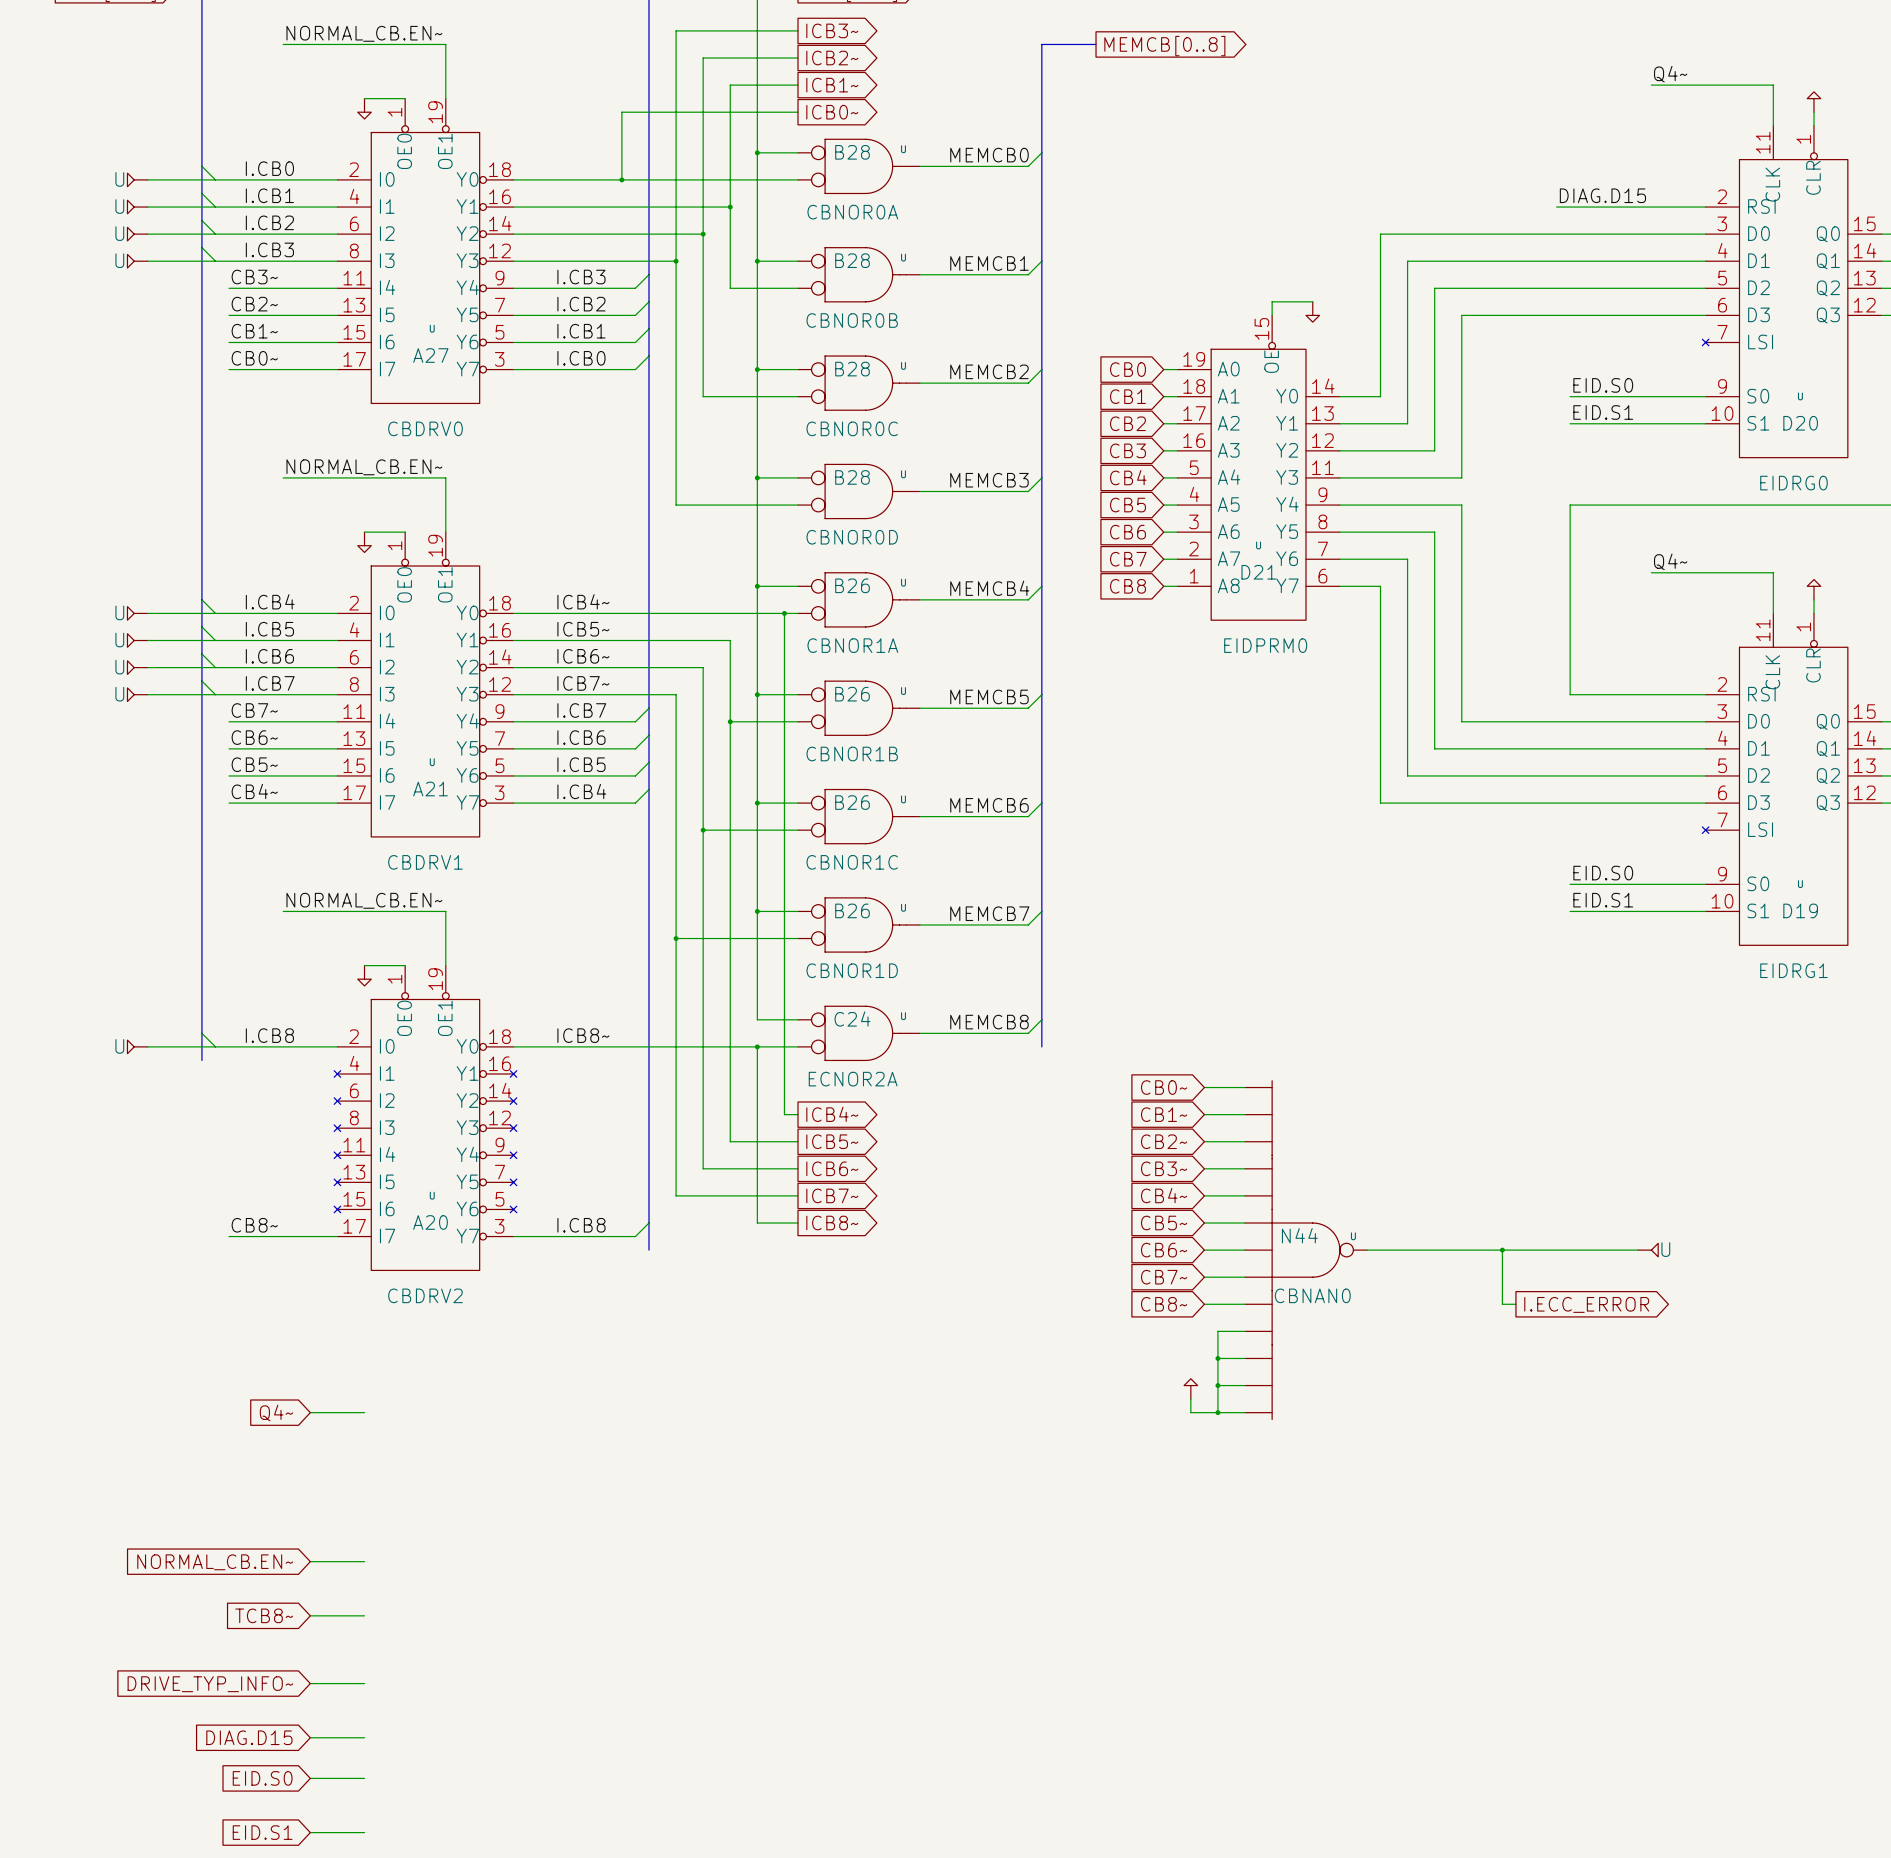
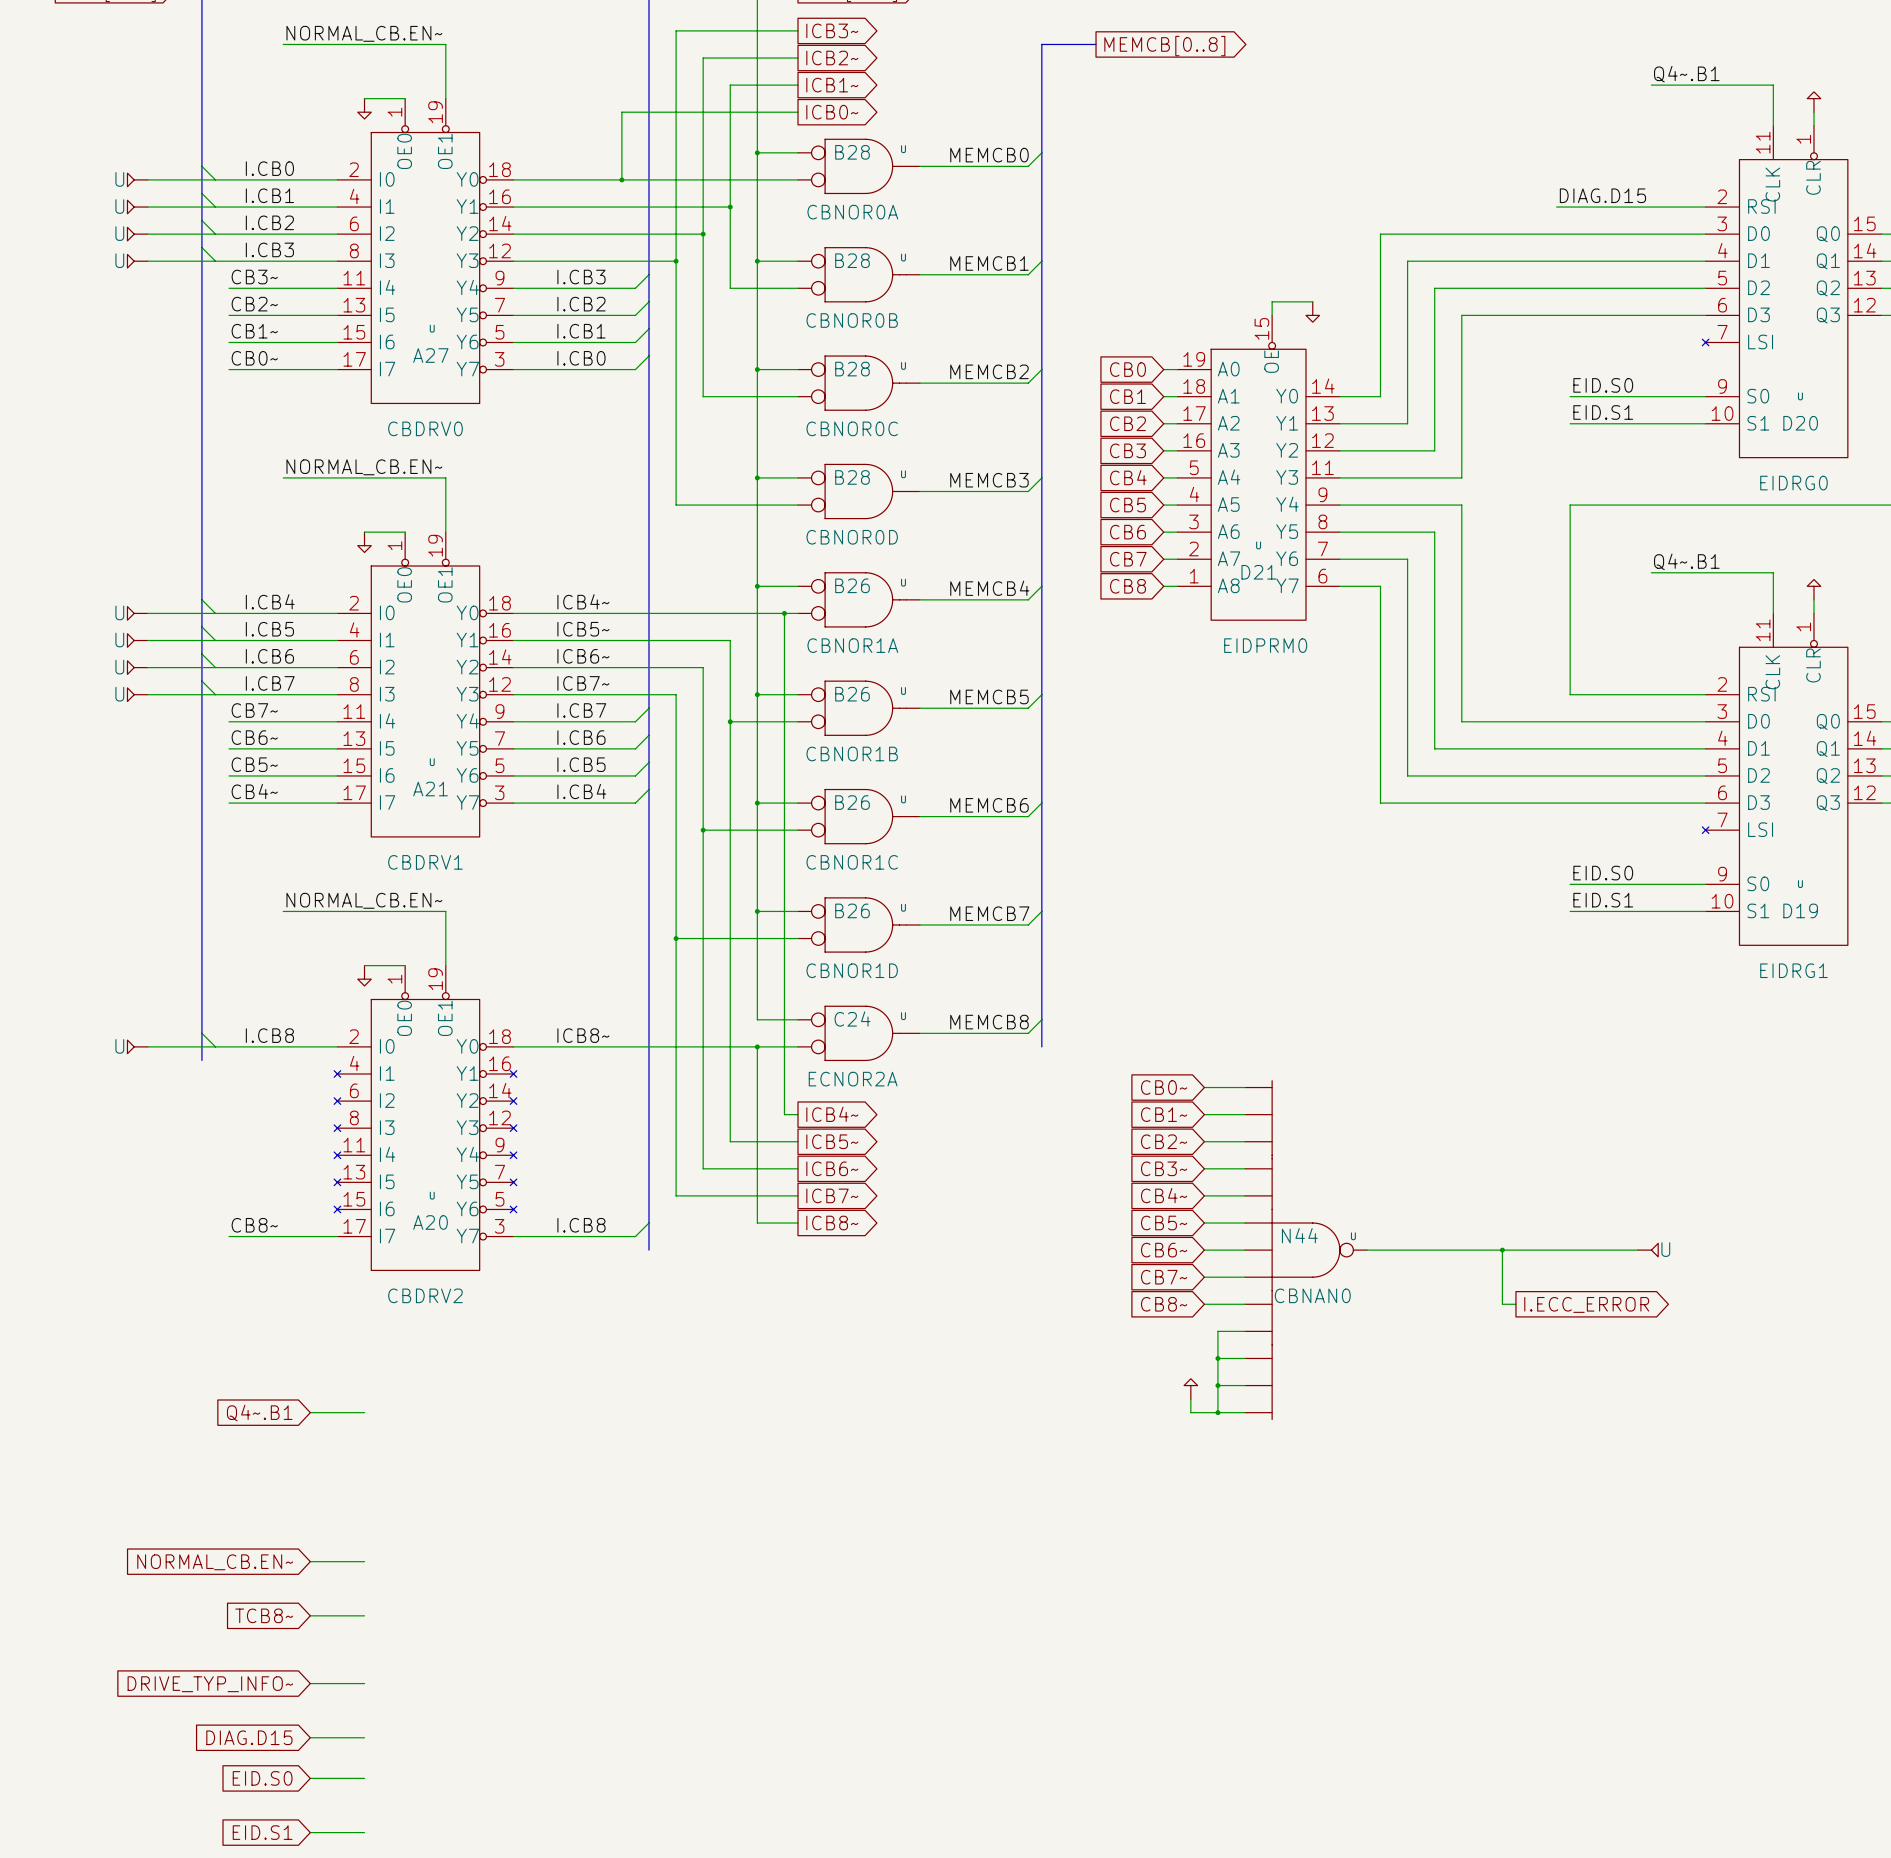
label: Q4~ (1670, 74) -> Q4~.B1 (1686, 74)
label: Q4~ (1670, 561) -> Q4~.B1 (1686, 561)
global label: Q4~ (276, 1412) -> Q4~.B1 (259, 1412)

